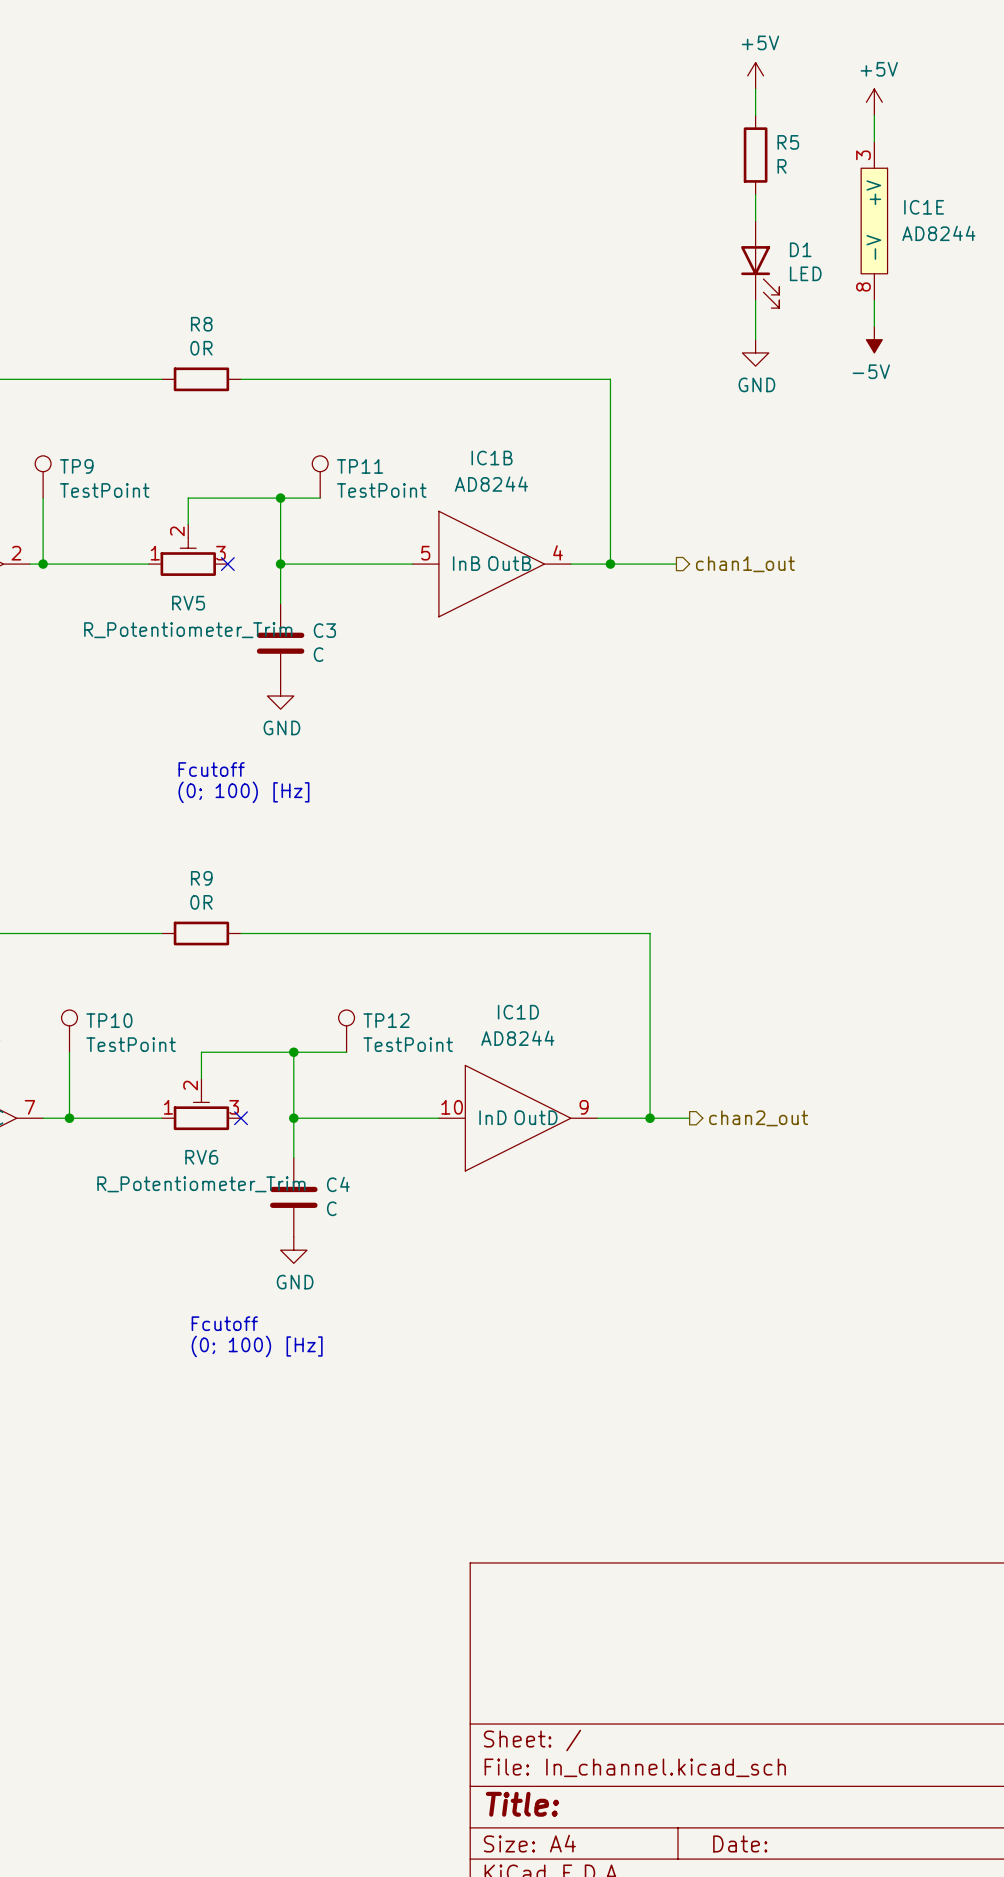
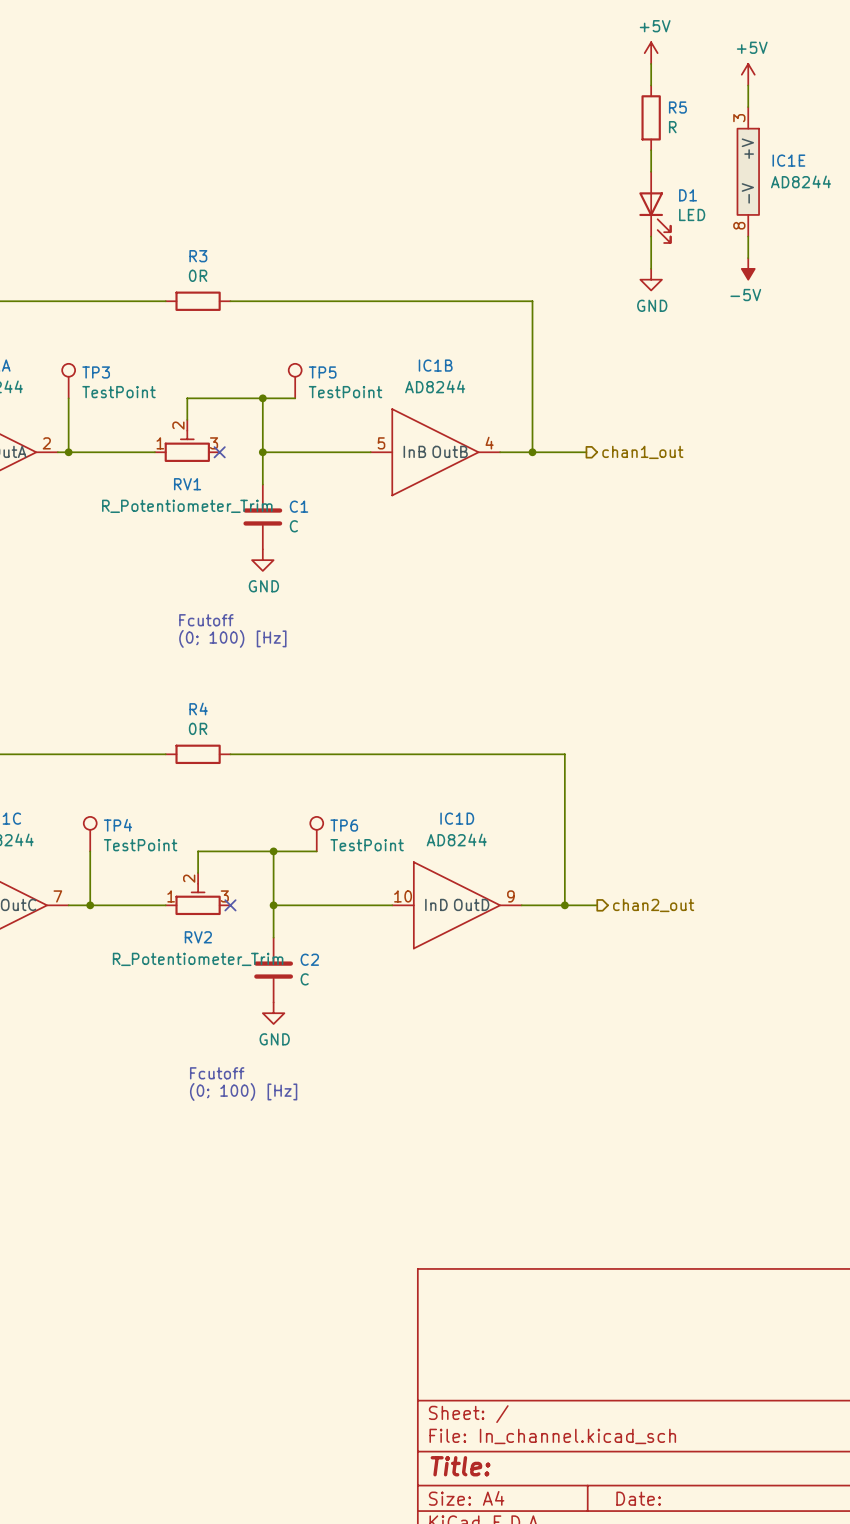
R8 name: R8 (201, 324) -> R3 (198, 256)
TP9 name: TP9 (76, 466) -> TP3 (96, 372)
TP11 name: TP11 (360, 466) -> TP5 (322, 372)
RV5 name: RV5 (188, 603) -> RV1 (187, 484)
C3 name: C3 (324, 630) -> C1 (299, 506)
R9 name: R9 (201, 878) -> R4 (198, 709)
TP10 name: TP10 (109, 1020) -> TP4 (117, 825)
TP12 name: TP12 (386, 1020) -> TP6 (344, 825)
RV6 name: RV6 (201, 1157) -> RV2 (198, 937)
C4 name: C4 (338, 1184) -> C2 (309, 959)

